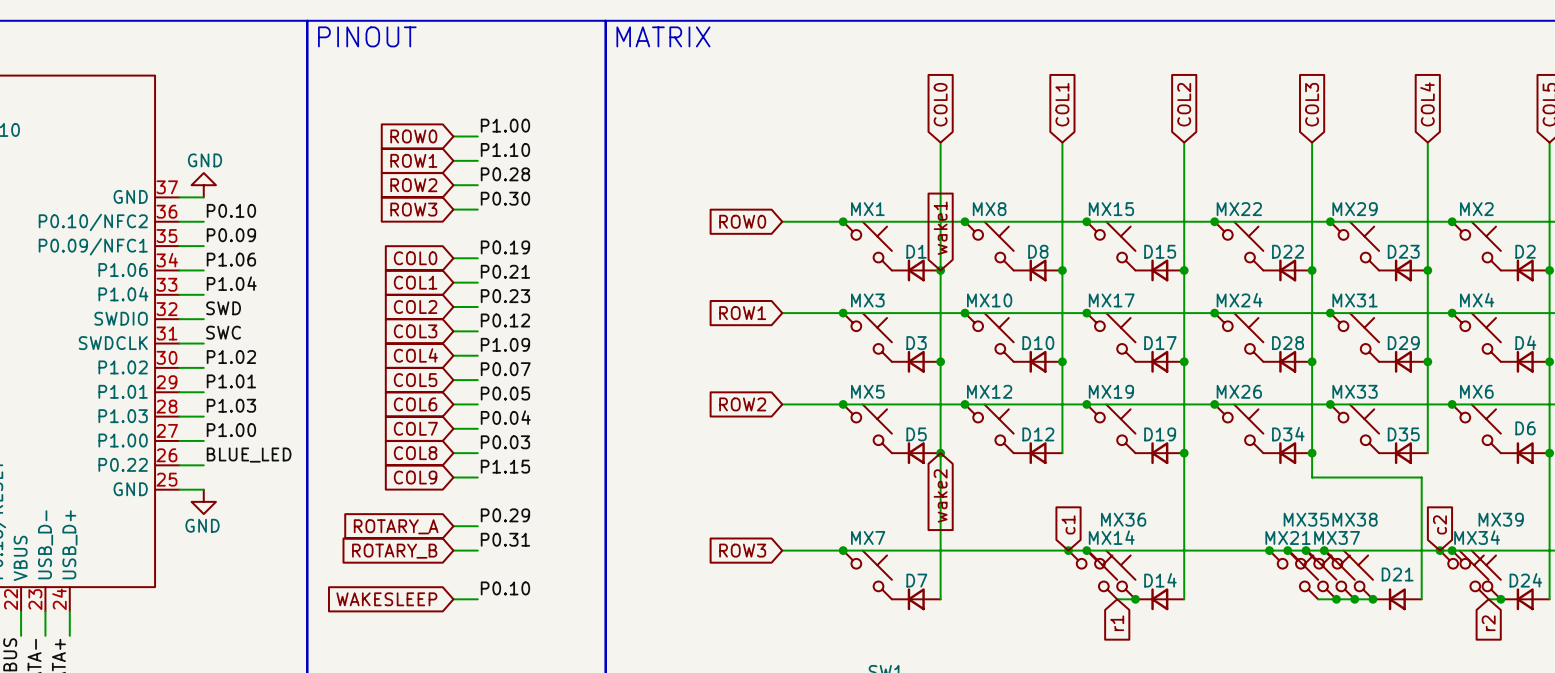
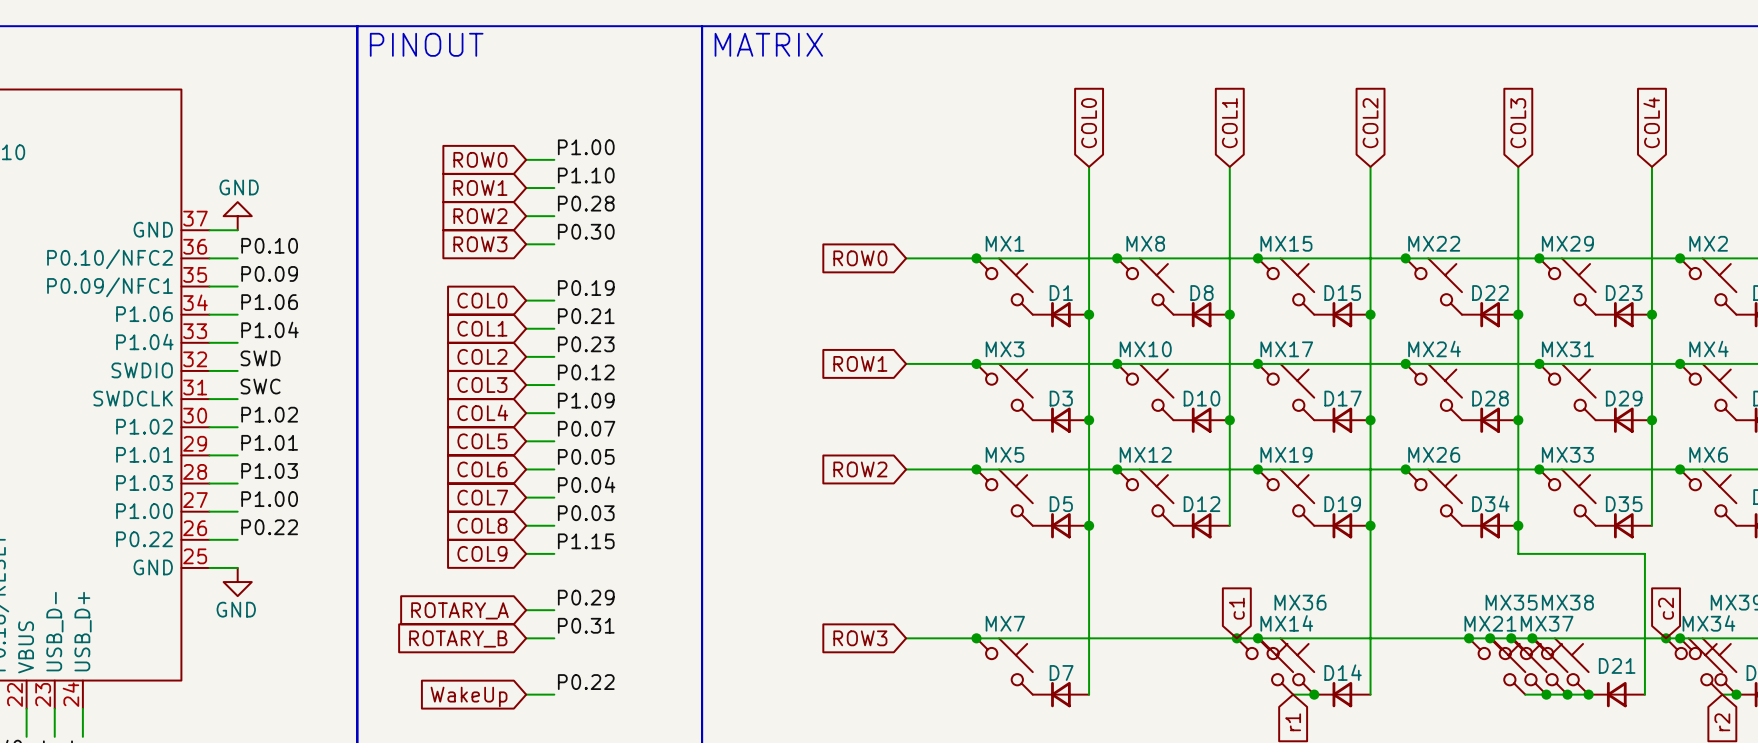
global label: wake1 (940, 228) -> none
label: BLUE_LED (249, 455) -> P0.22 (269, 527)
global label: wake2 (940, 495) -> none
label: P0.10 (505, 588) -> P0.22 (586, 682)
global label: WAKESLEEP (386, 599) -> WakeUp (469, 696)

